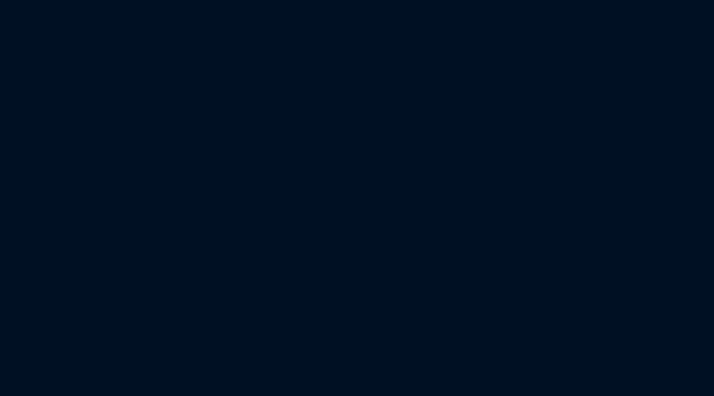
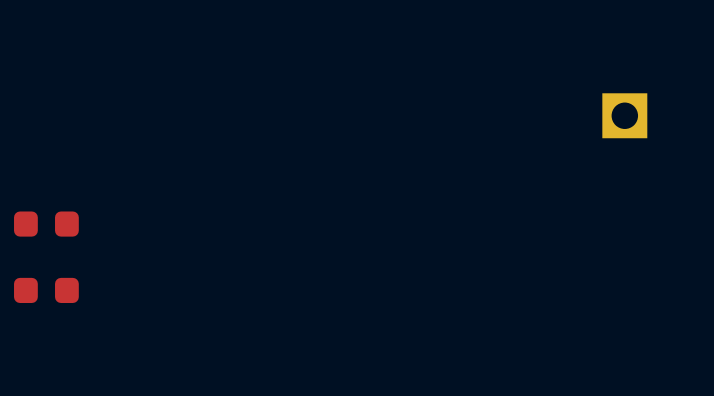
part: none -> (624, 115)
part: none -> (46, 224)
part: none -> (46, 290)

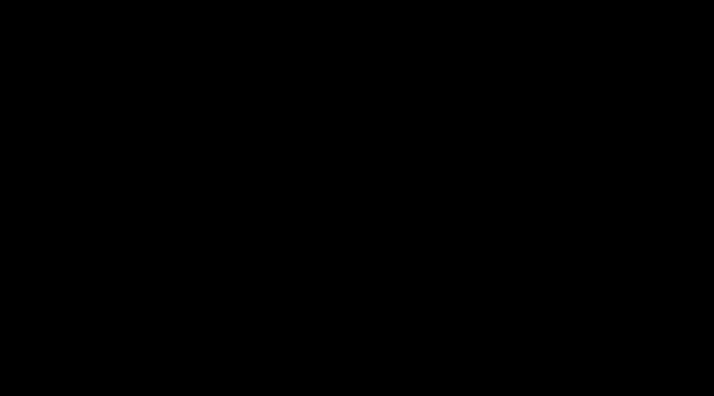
part: (624, 115) -> none
part: (46, 224) -> none
part: (46, 290) -> none

